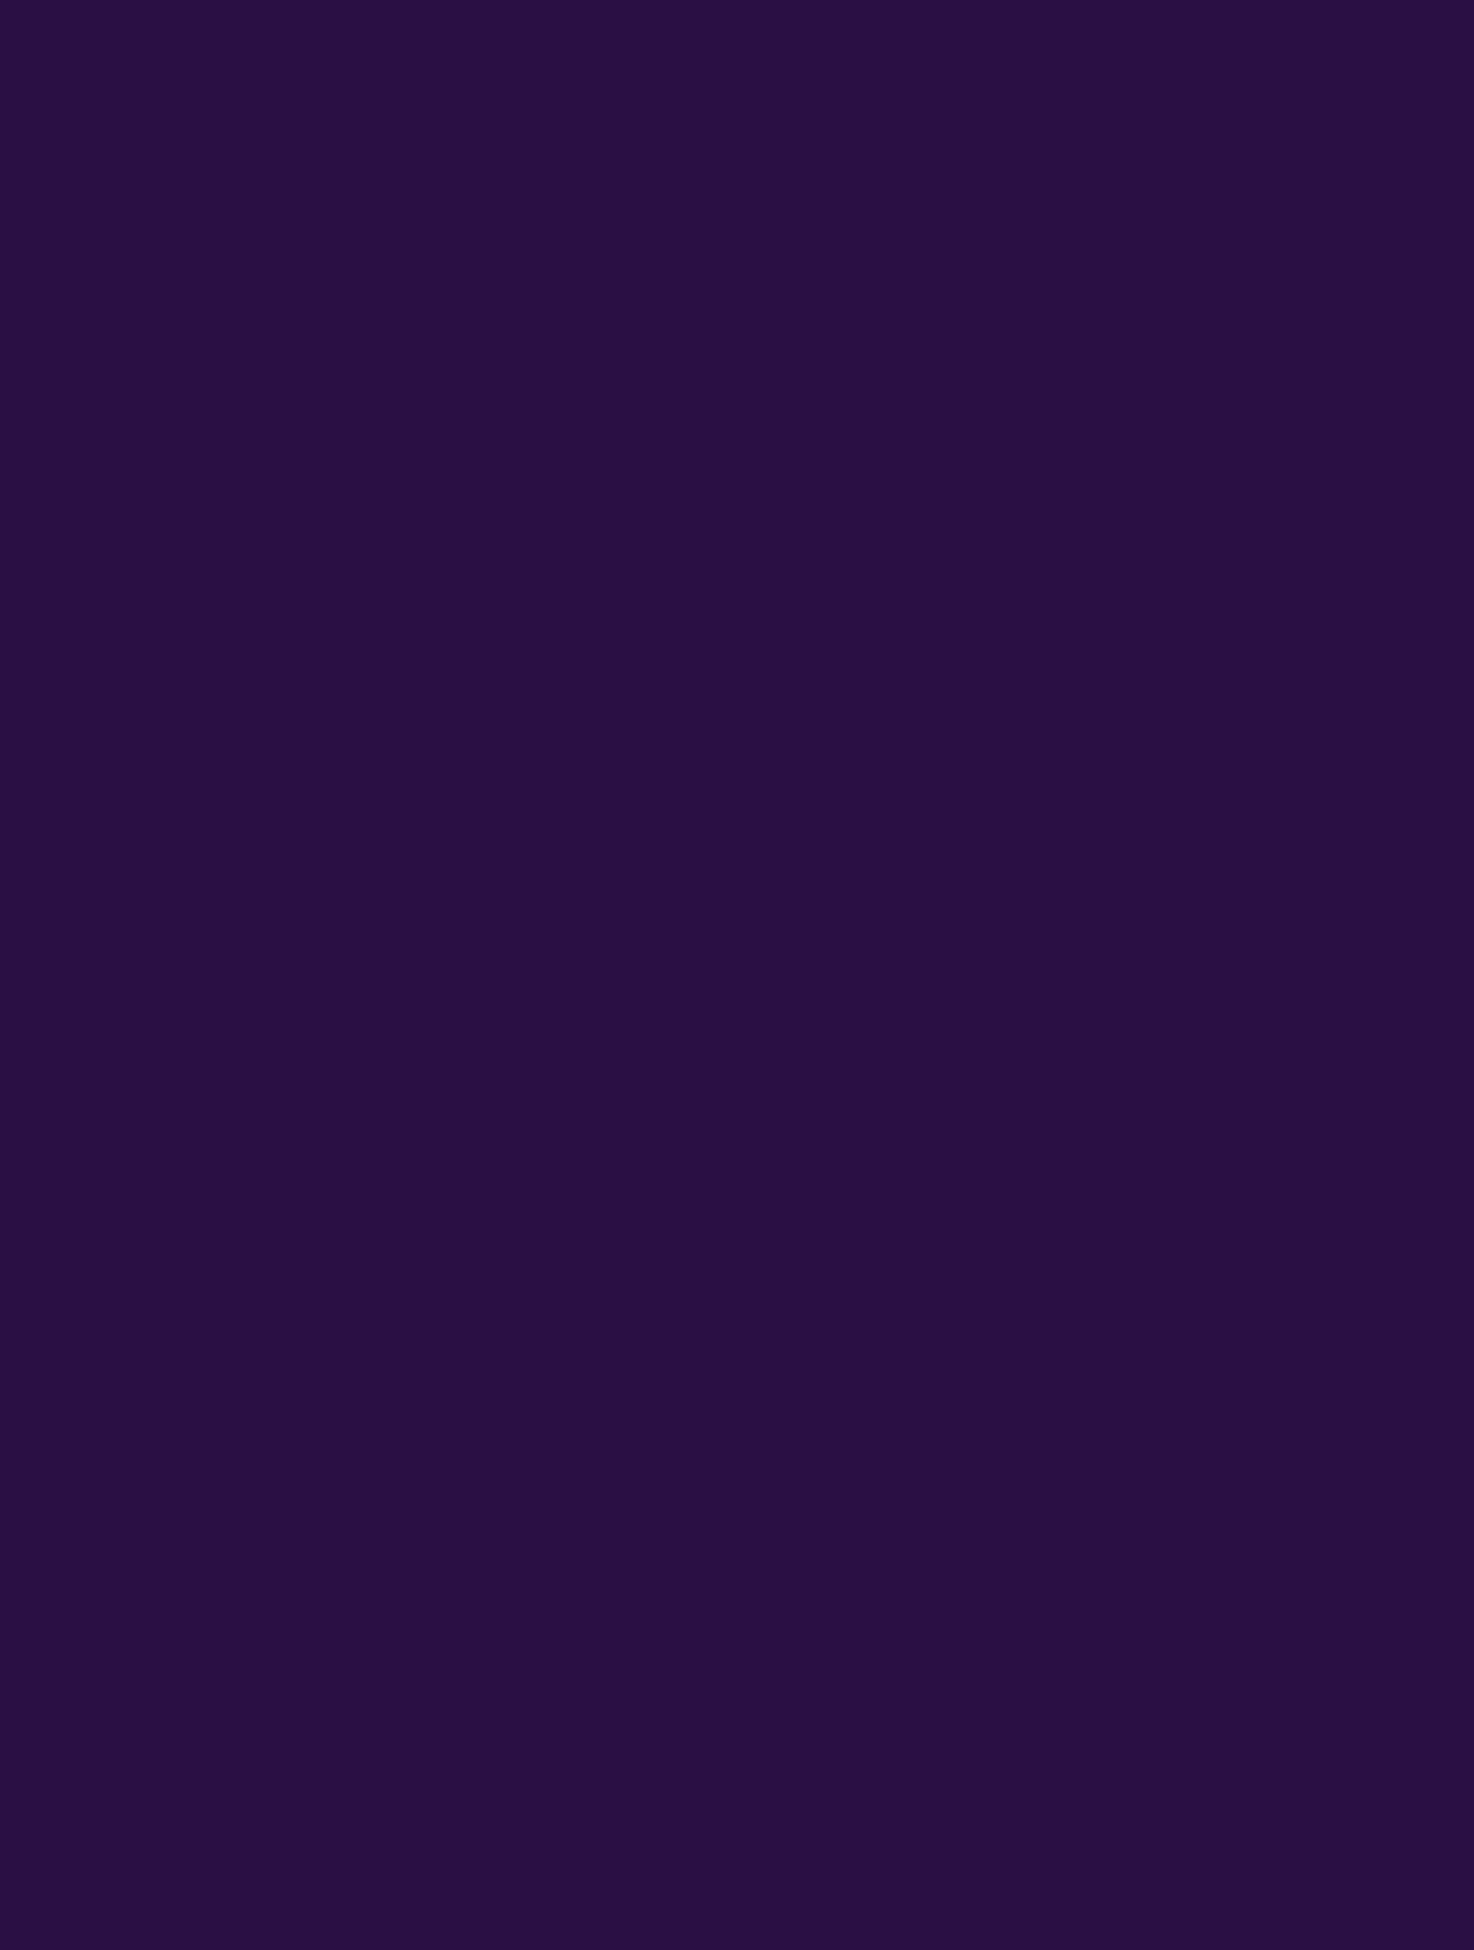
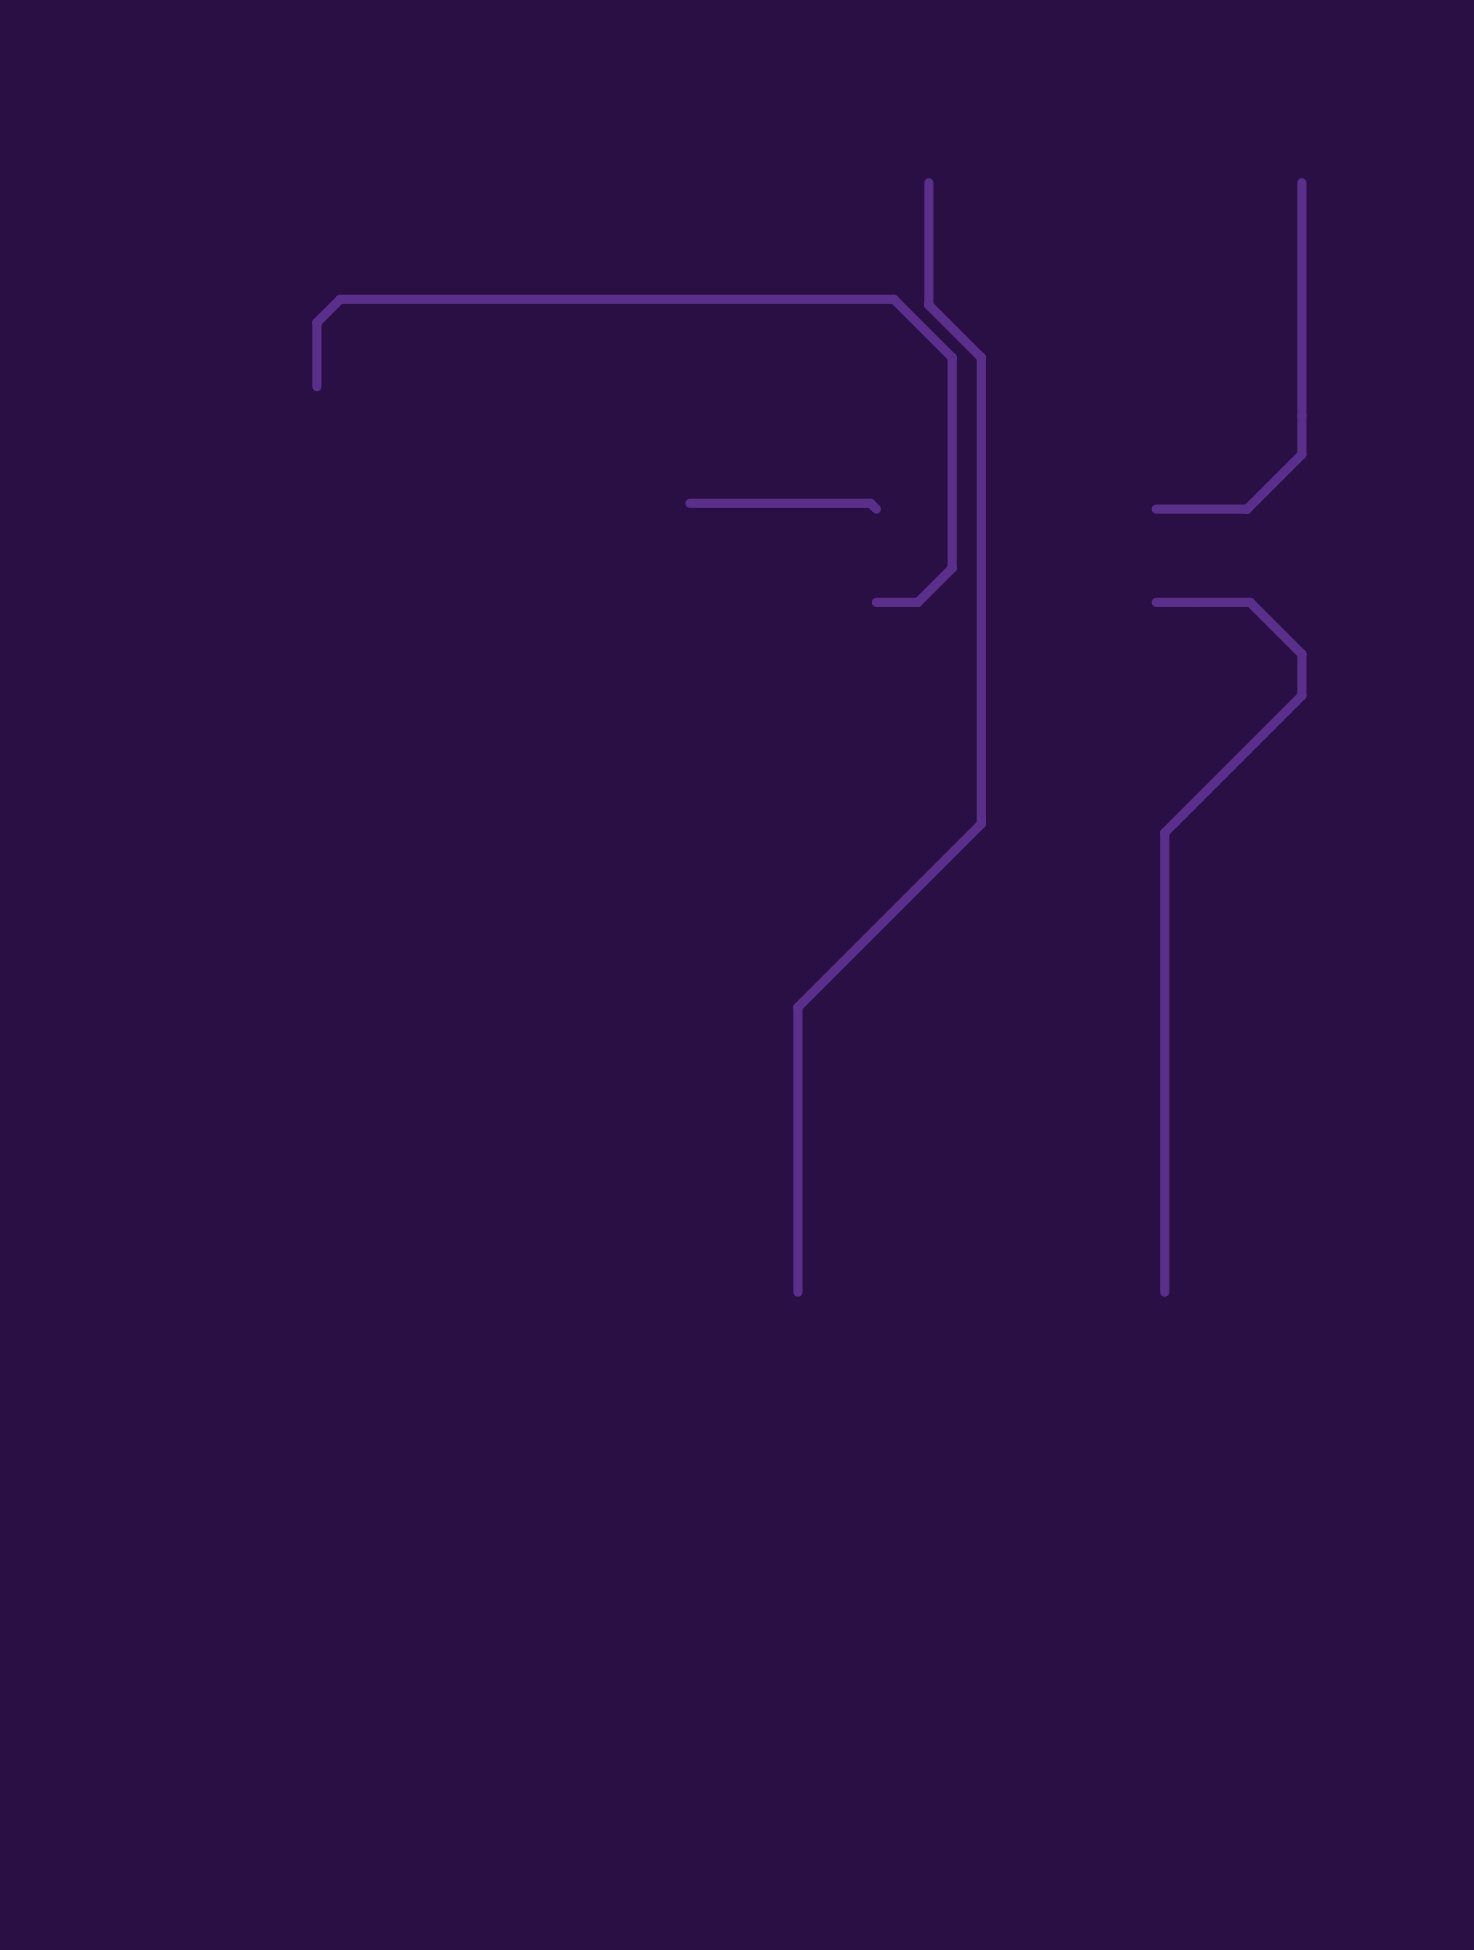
track: none -> (928, 182) (928, 305) (981, 357) (981, 823) (797, 1007) (797, 1292)
track: none -> (1301, 182) (1301, 454) (1247, 509) (1156, 509)
track: none -> (316, 386) (316, 322) (340, 299) (893, 299) (952, 357) (952, 568) (917, 602) (876, 602)
track: none -> (689, 503) (870, 503) (876, 509)
track: none -> (1156, 602) (1250, 602) (1301, 654) (1301, 695) (1164, 832) (1164, 1292)

